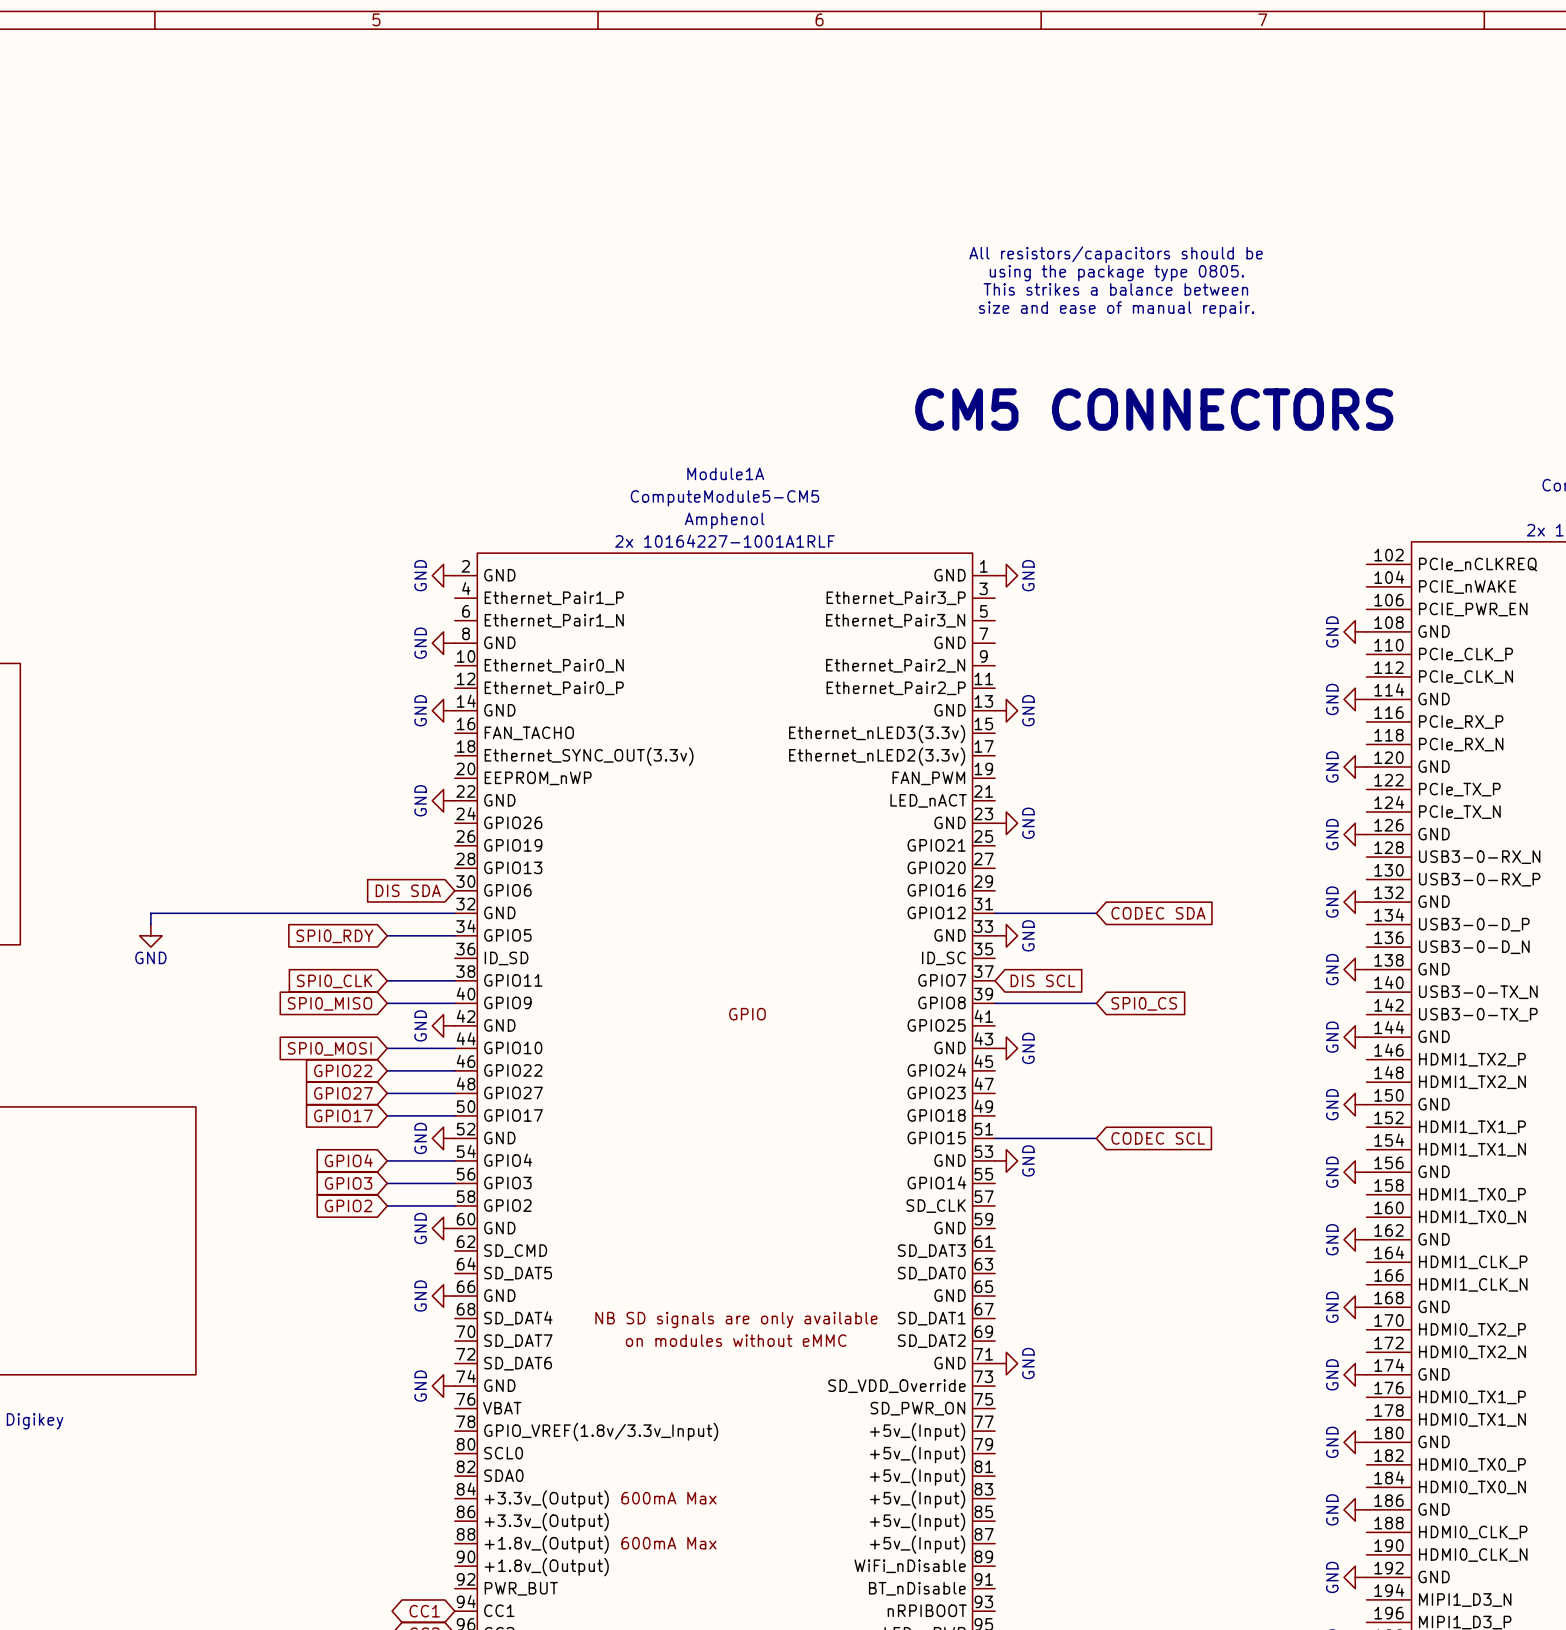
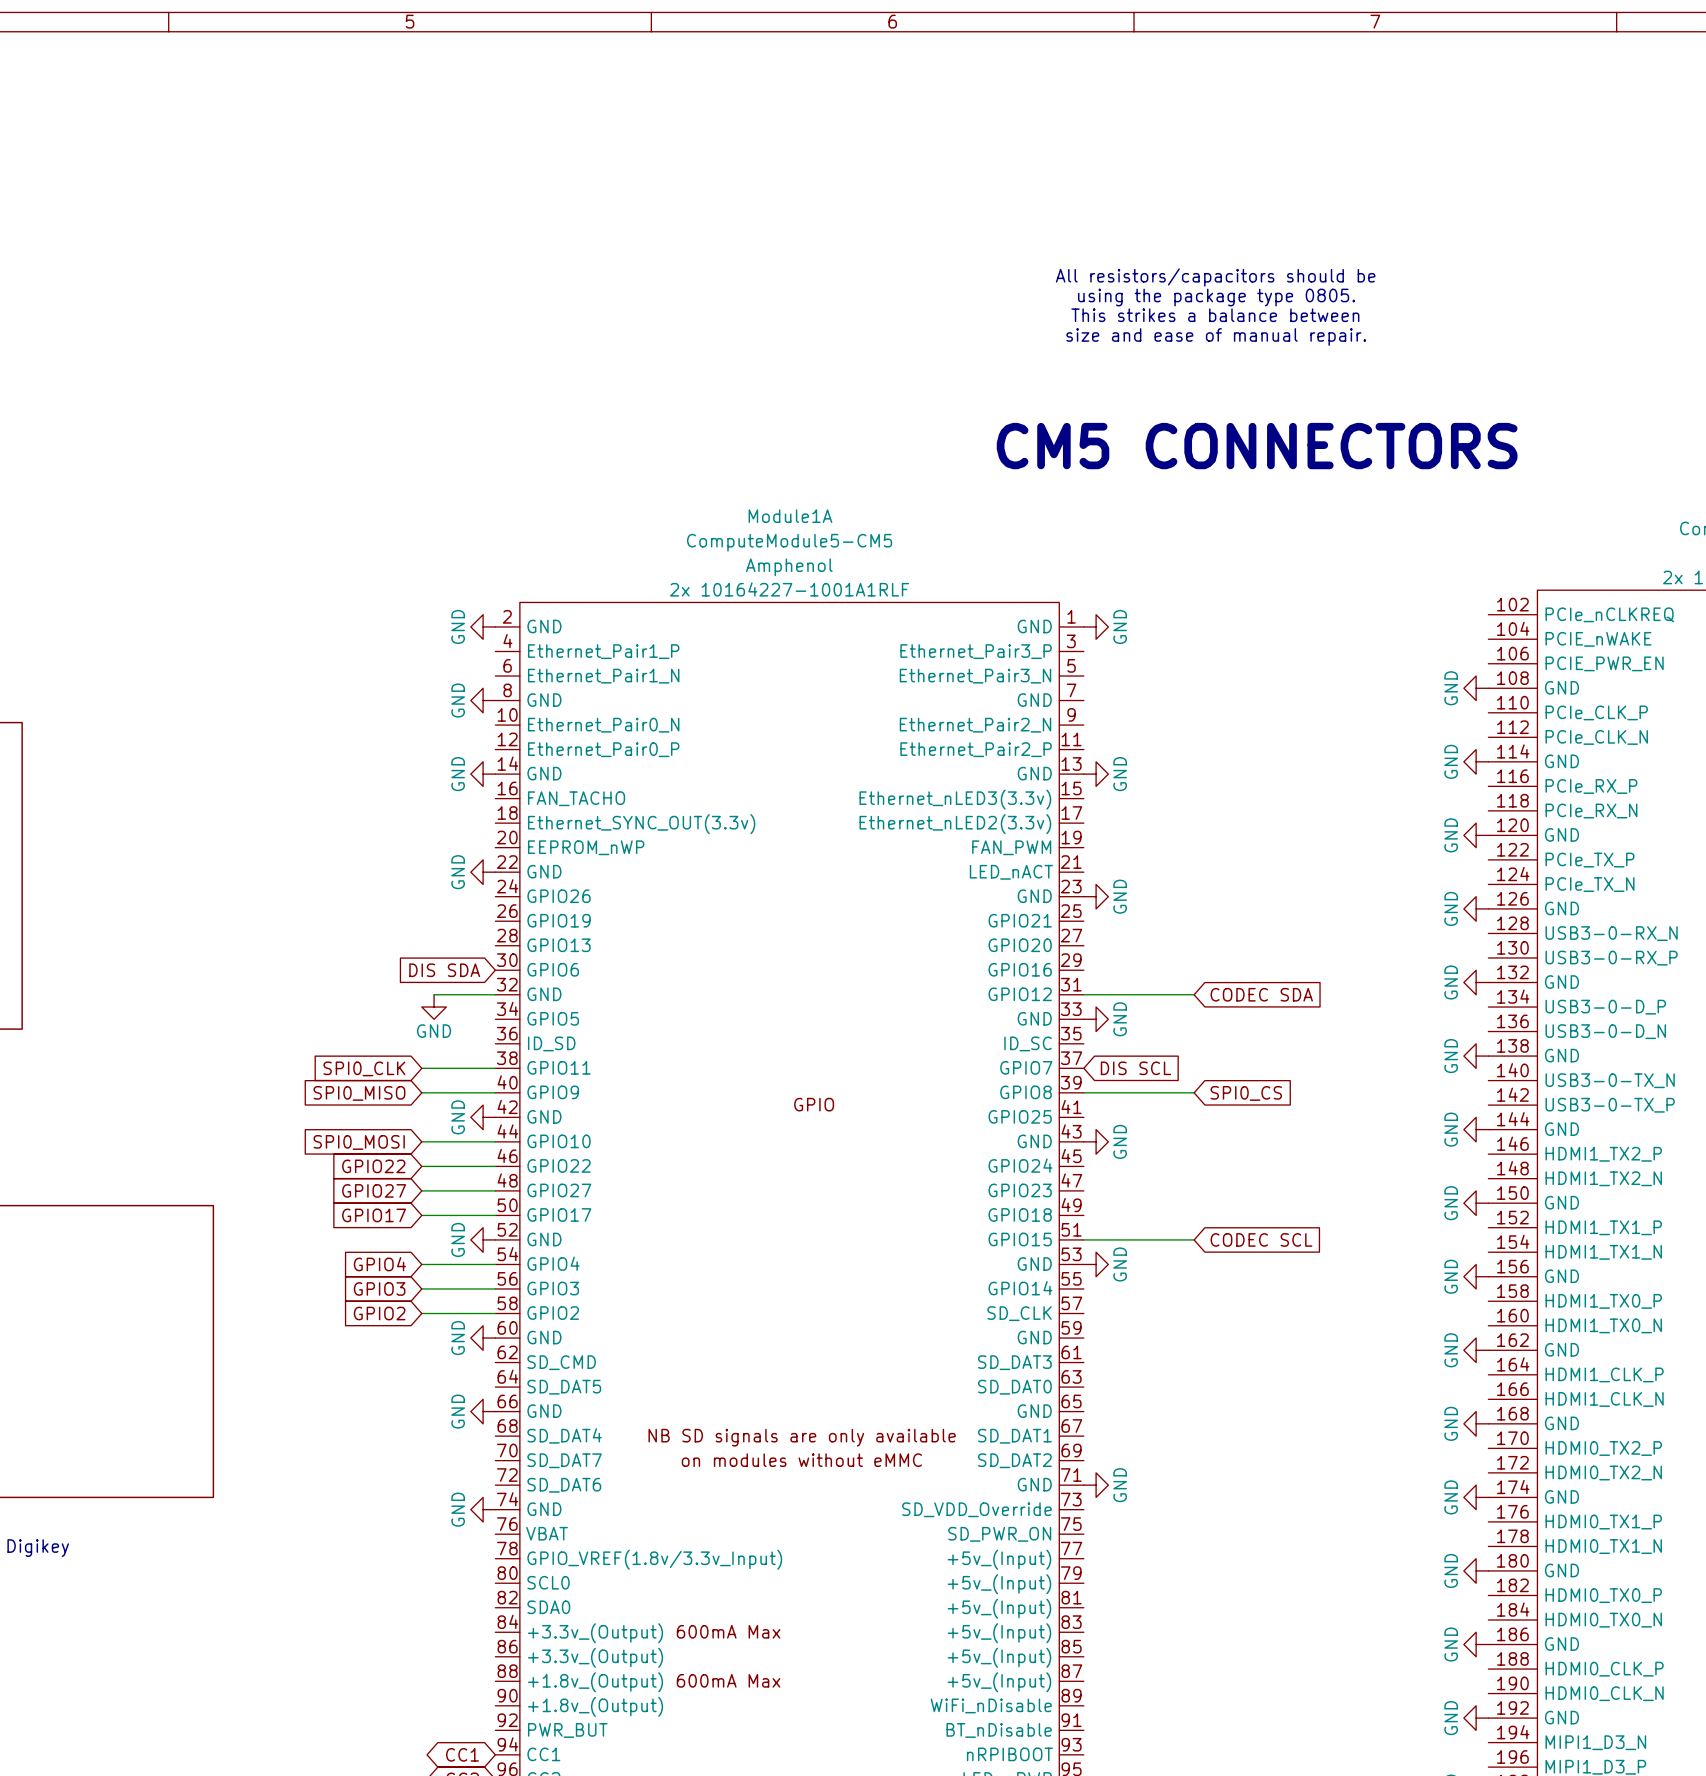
wire: (398, 913) (150, 913) (150, 924) -> none
power symbol: none -> GND (434, 1007)
power symbol: GND (150, 935) -> none
wire: (387, 935) (454, 935) -> none
global label: SPI0_RDY (334, 936) -> none

